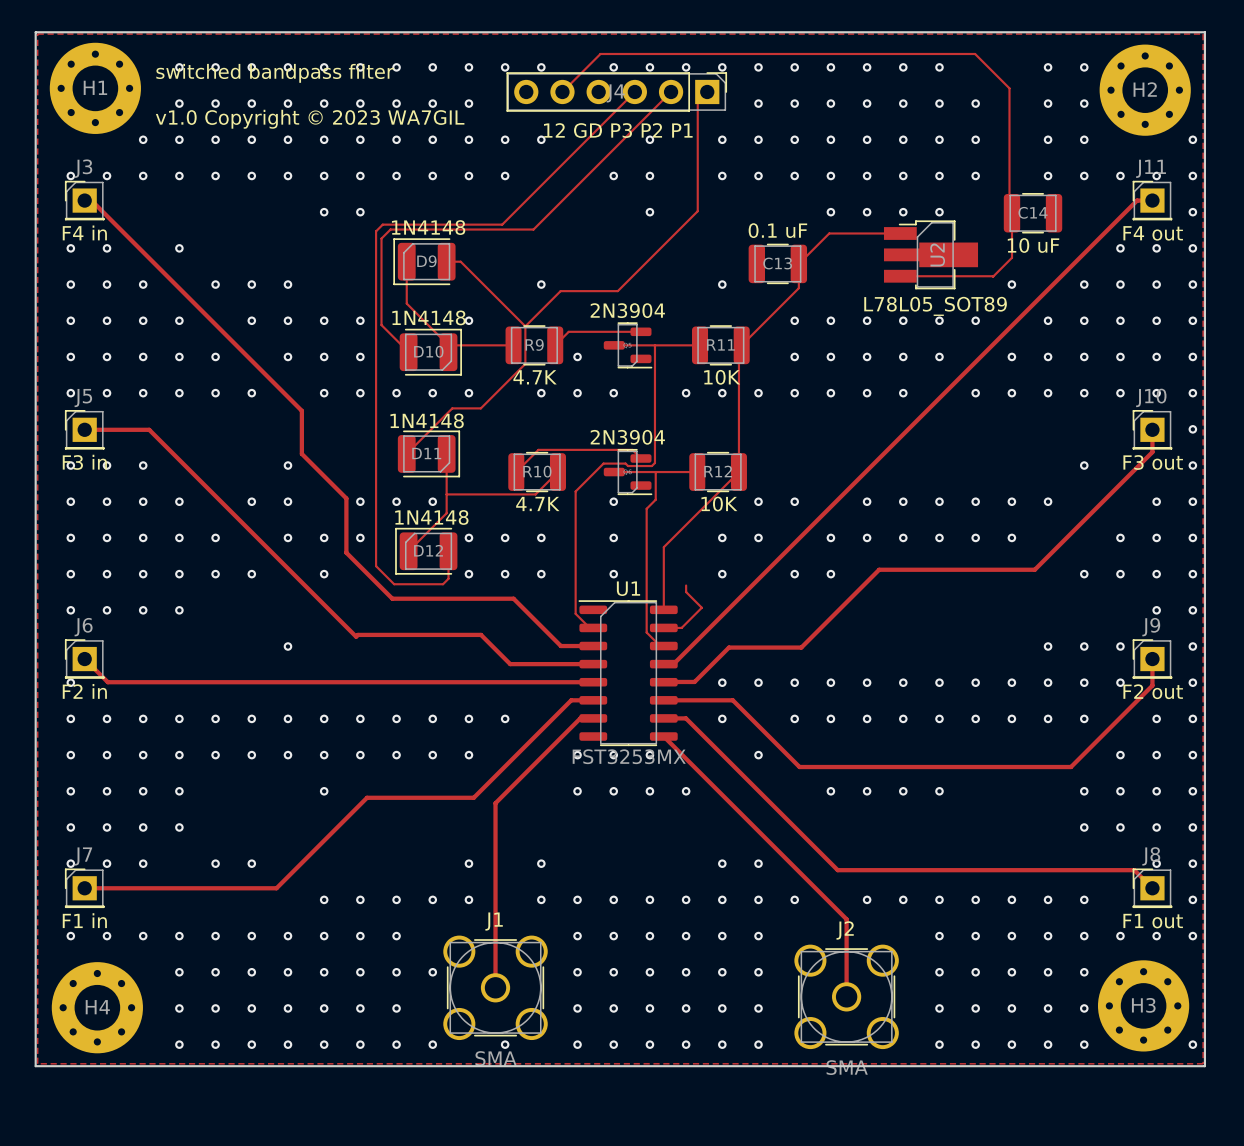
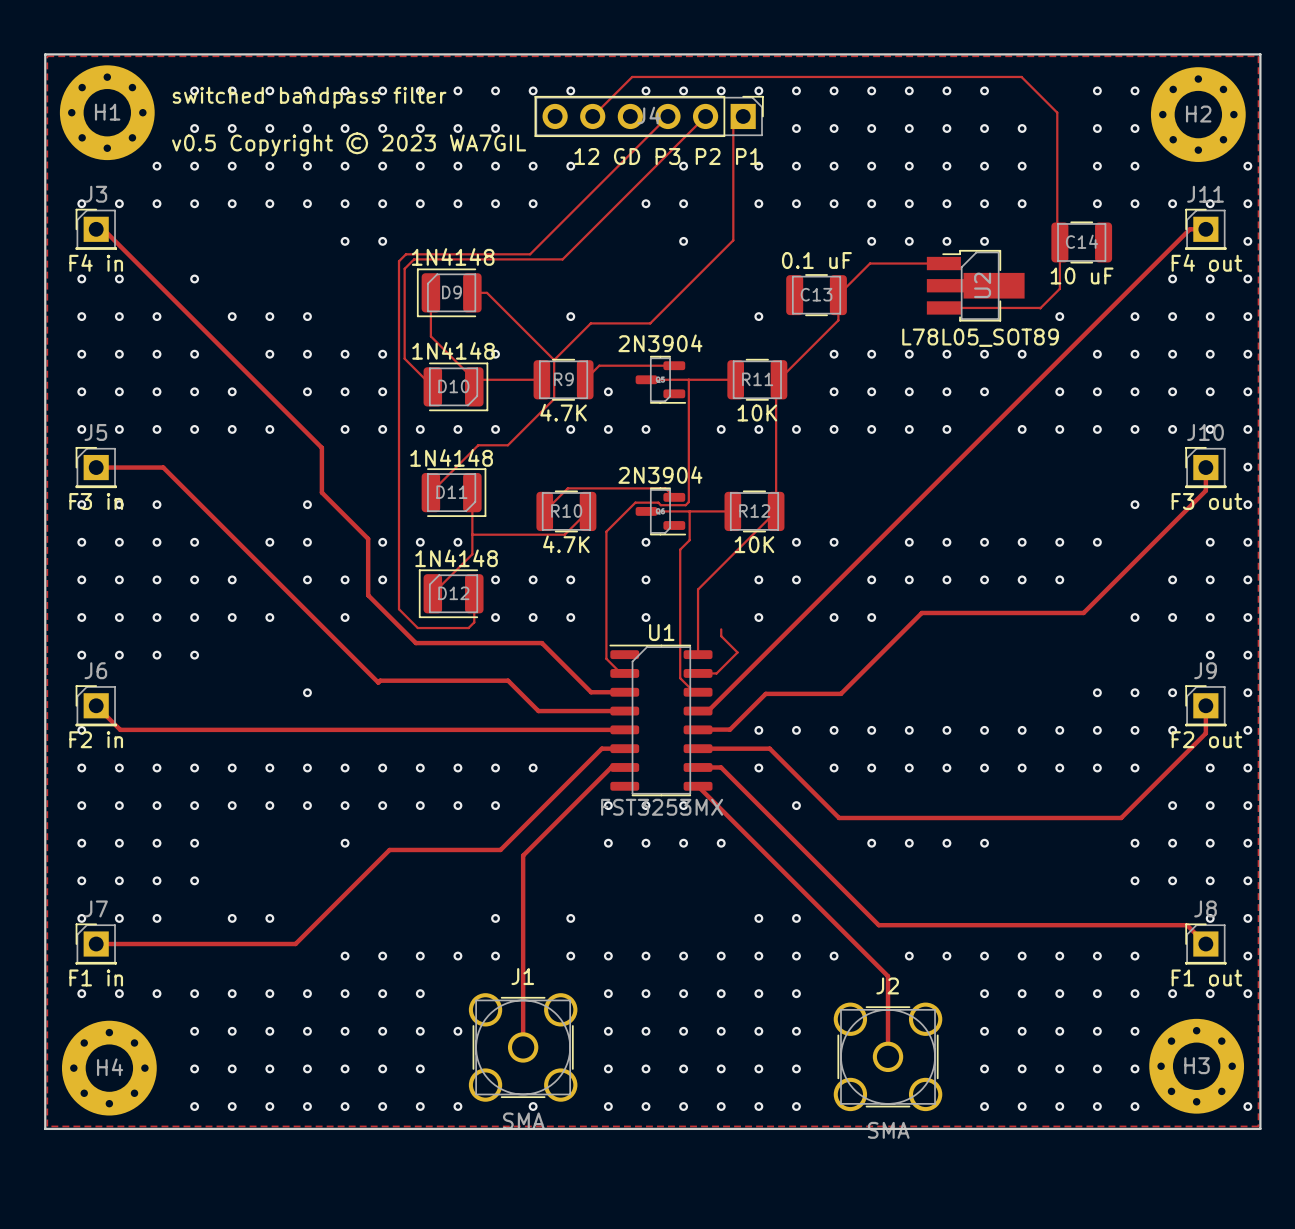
text: v1.0 Copyright © 2023 WA7GIL (310, 119) -> v0.5 Copyright © 2023 WA7GIL (349, 144)

